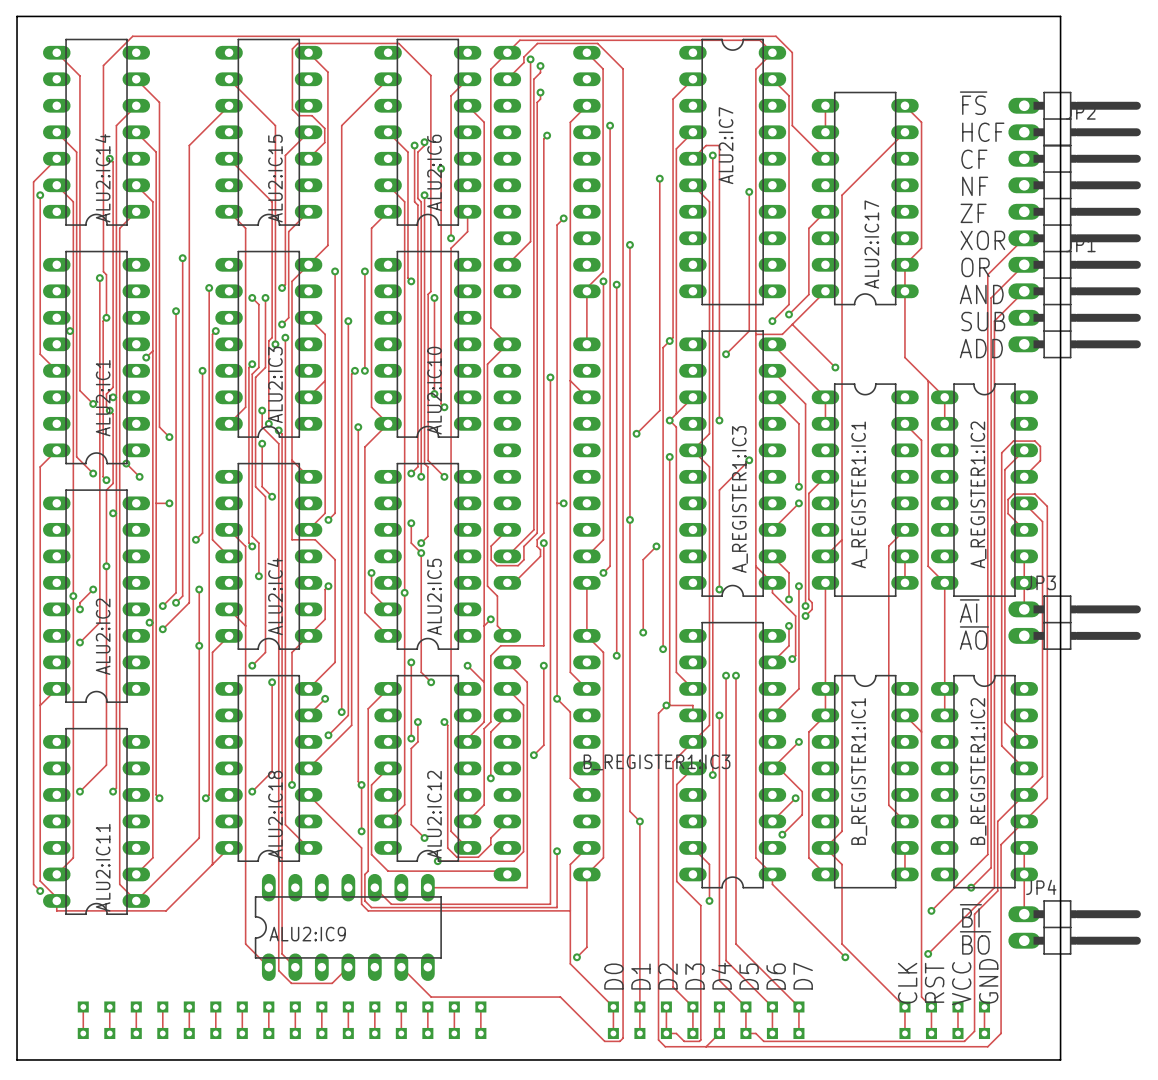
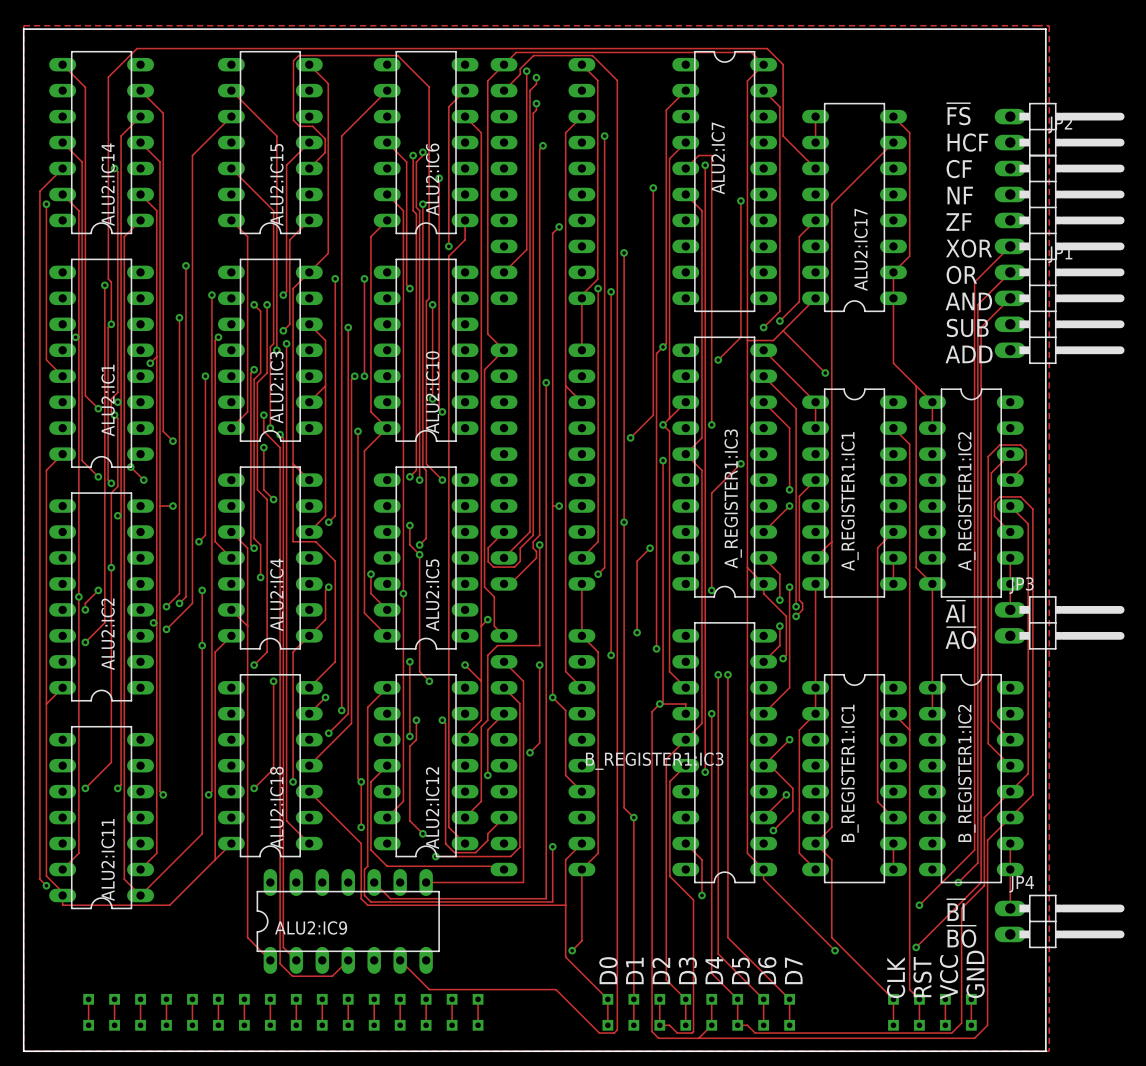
zone outline: none -> (23, 25) (23, 1051) (1049, 1051) (1049, 25) (23, 25)

